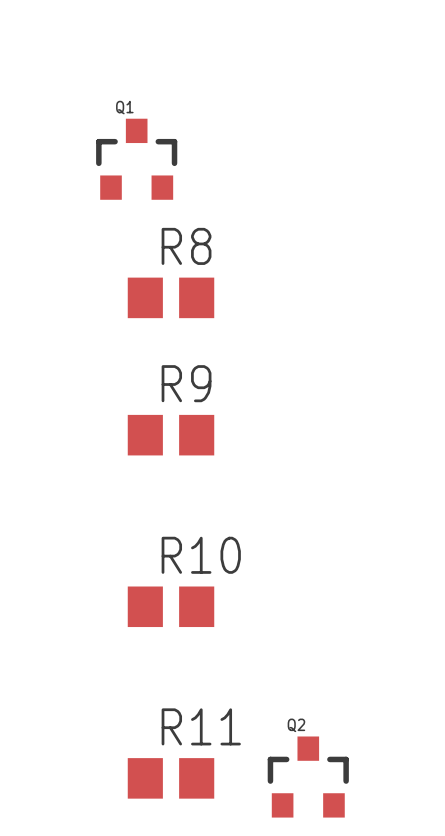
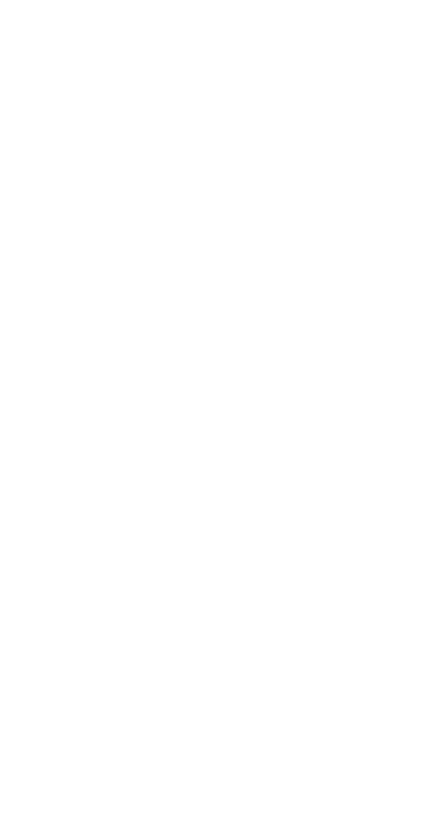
Q1: (136, 159) -> none
R8: (171, 297) -> none
R9: (171, 435) -> none
R10: (171, 606) -> none
Q2: (308, 777) -> none
R11: (171, 778) -> none

